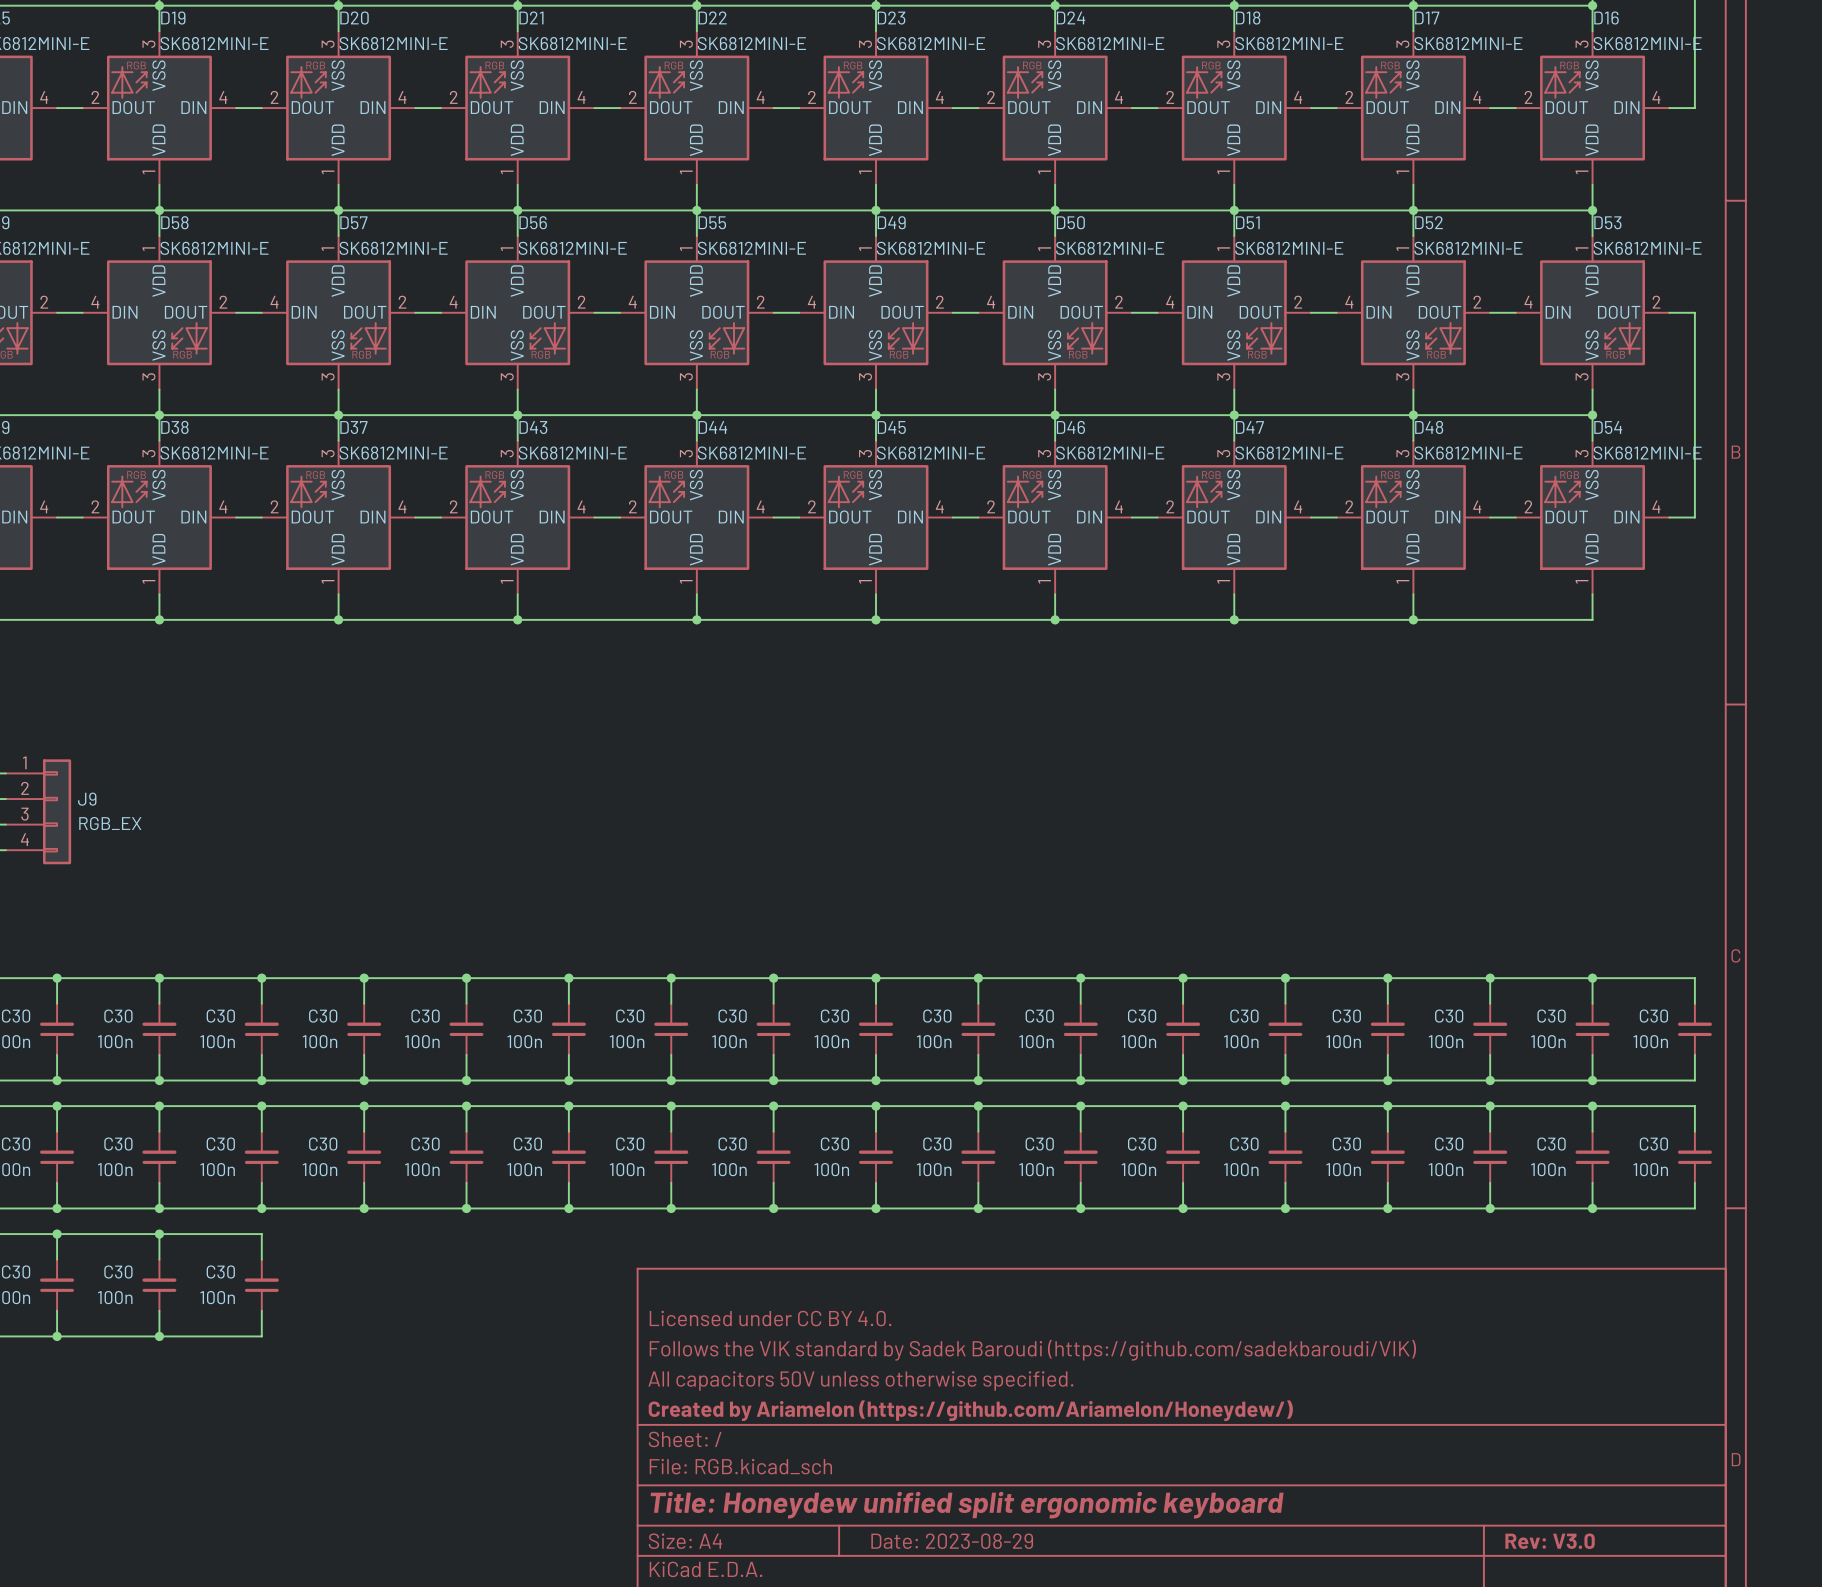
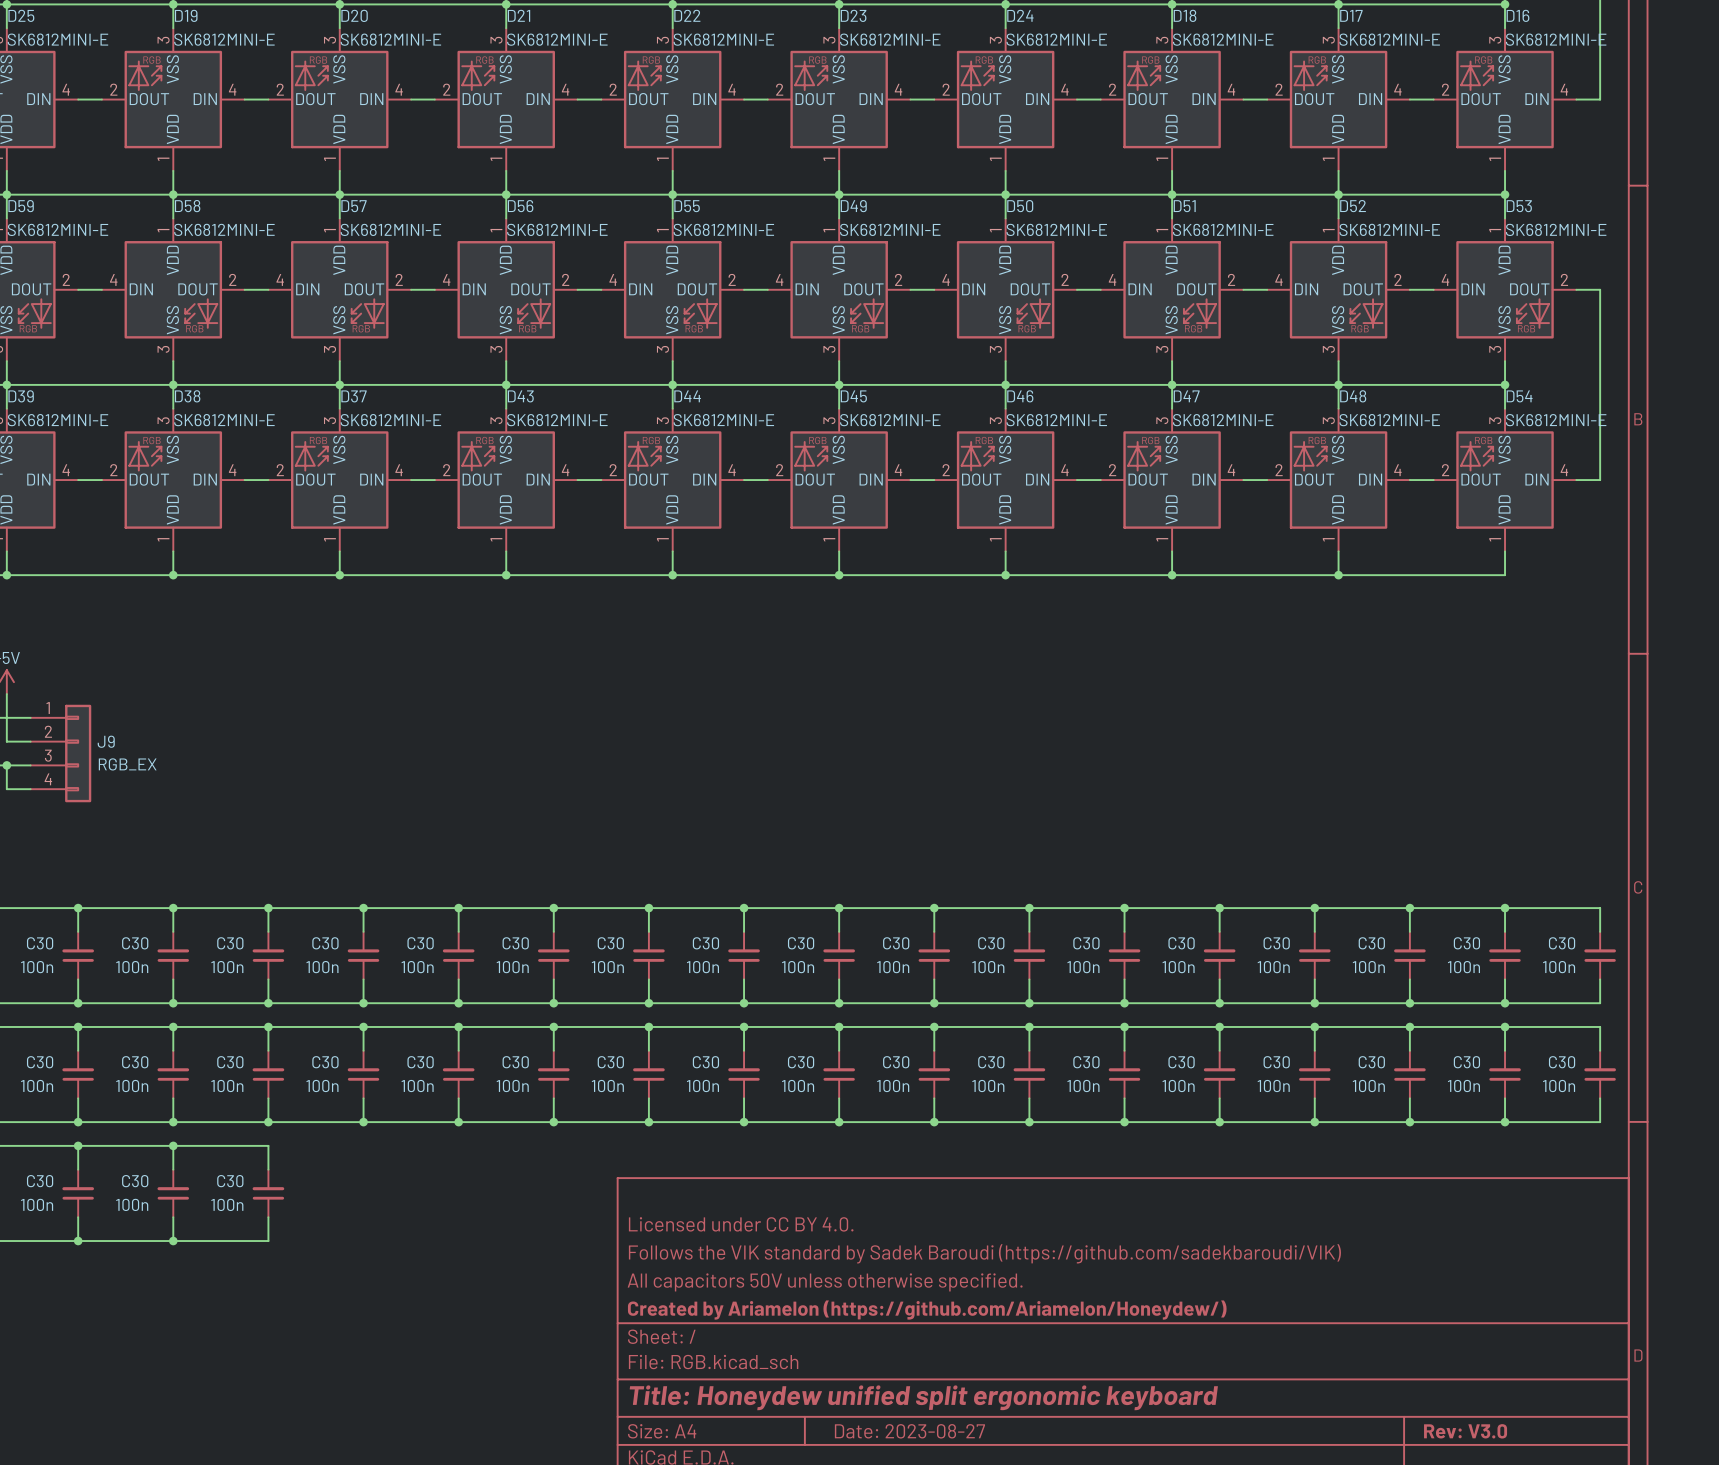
title block: Date: 2023-08-29 (952, 1541) -> Date: 2023-08-27 (909, 1431)

